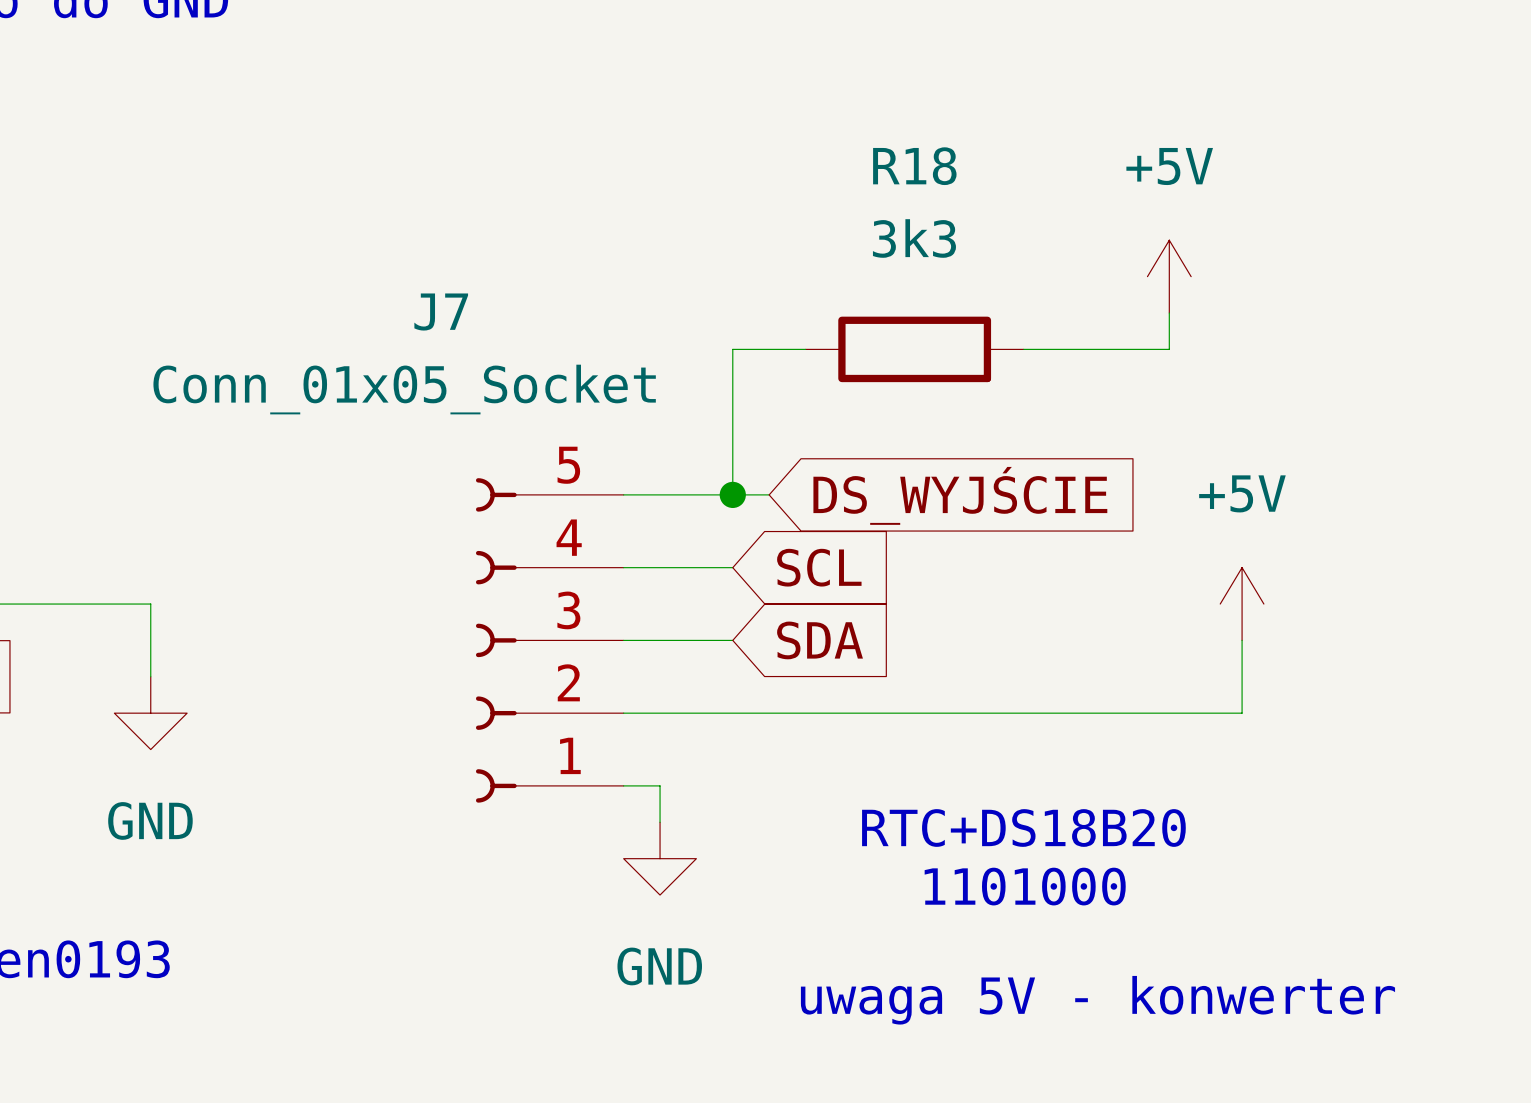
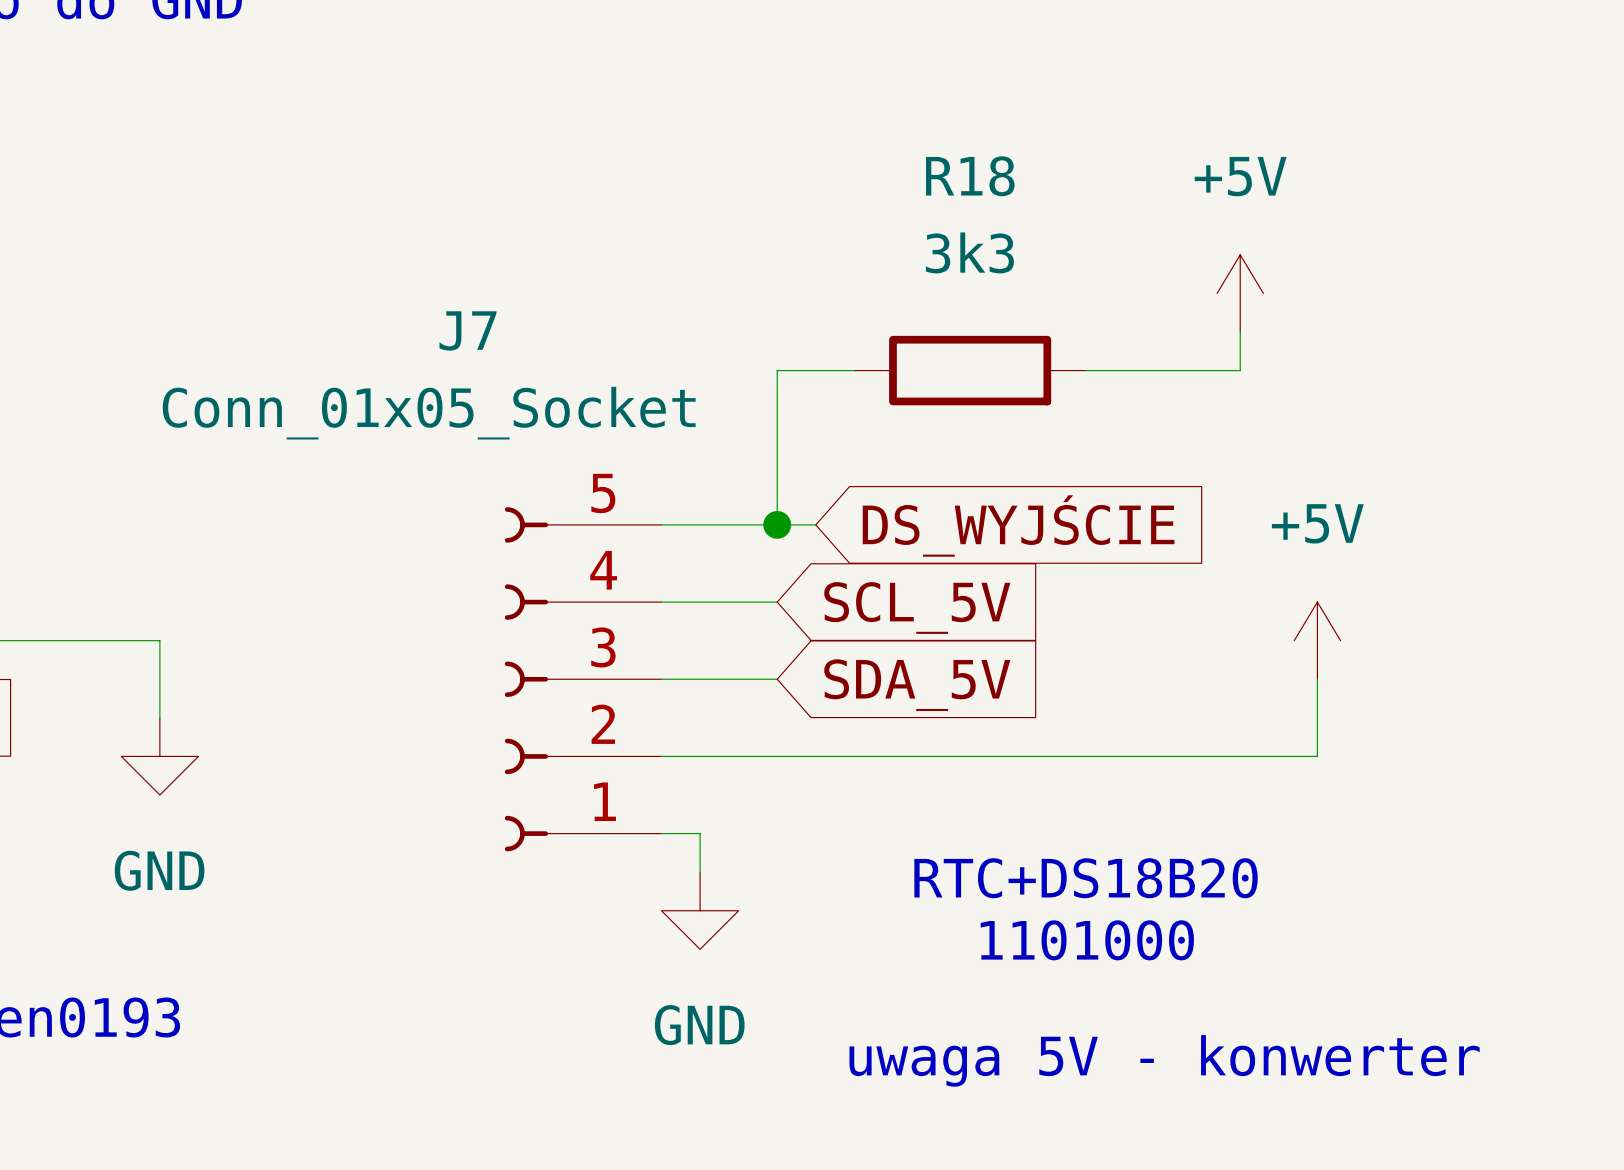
global label: SCL (819, 567) -> SCL_5V (917, 607)
global label: SDA (820, 640) -> SDA_5V (917, 685)

